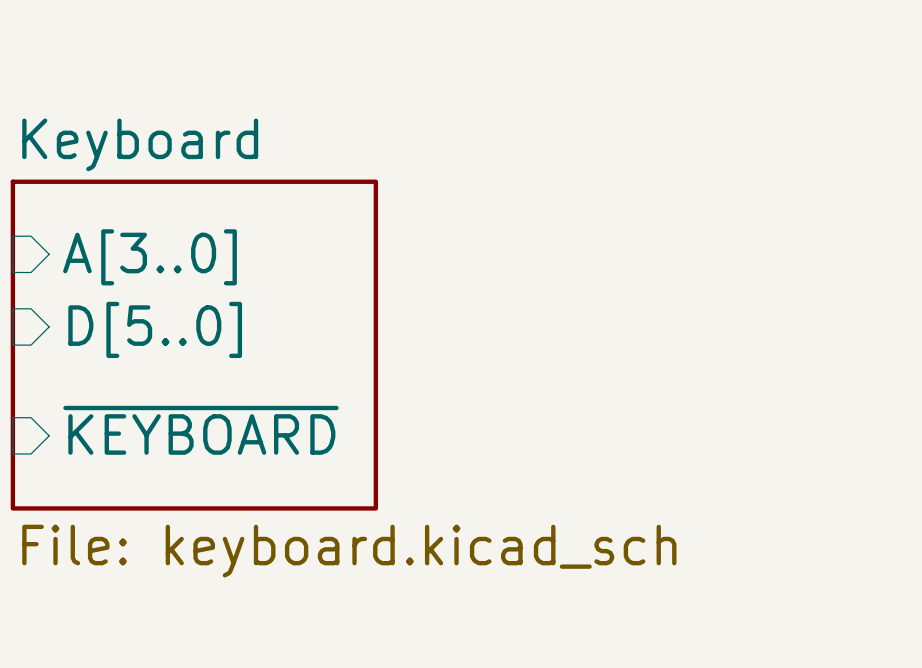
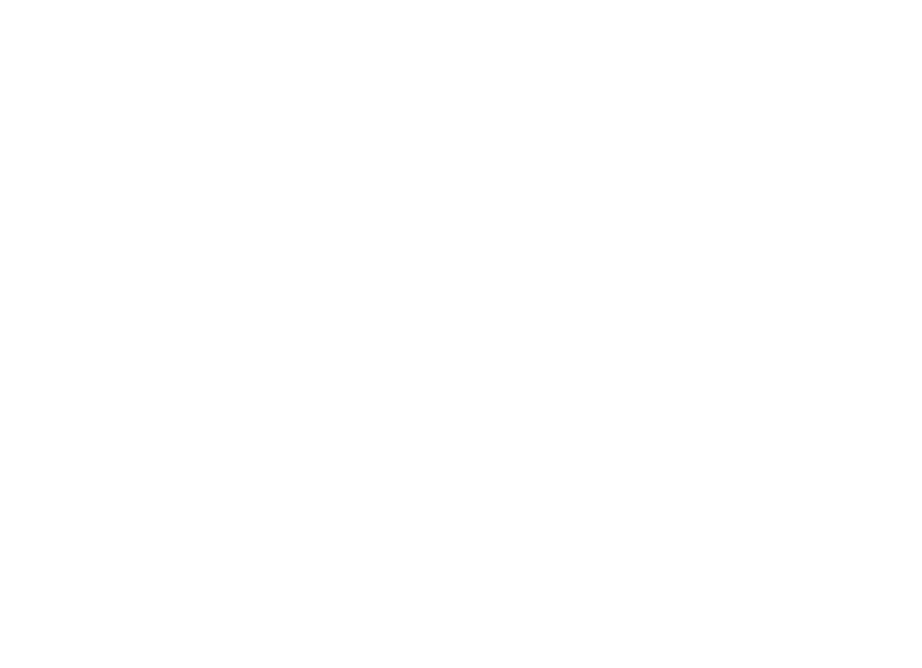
sheet pin: A[3..0] (150, 257) -> none
sheet pin: D[5..0] (155, 329) -> none
sheet Keyboard: File: keyboard.kicad_sch (194, 345) -> none
sheet pin: ~{KEYBOARD} (200, 430) -> none

